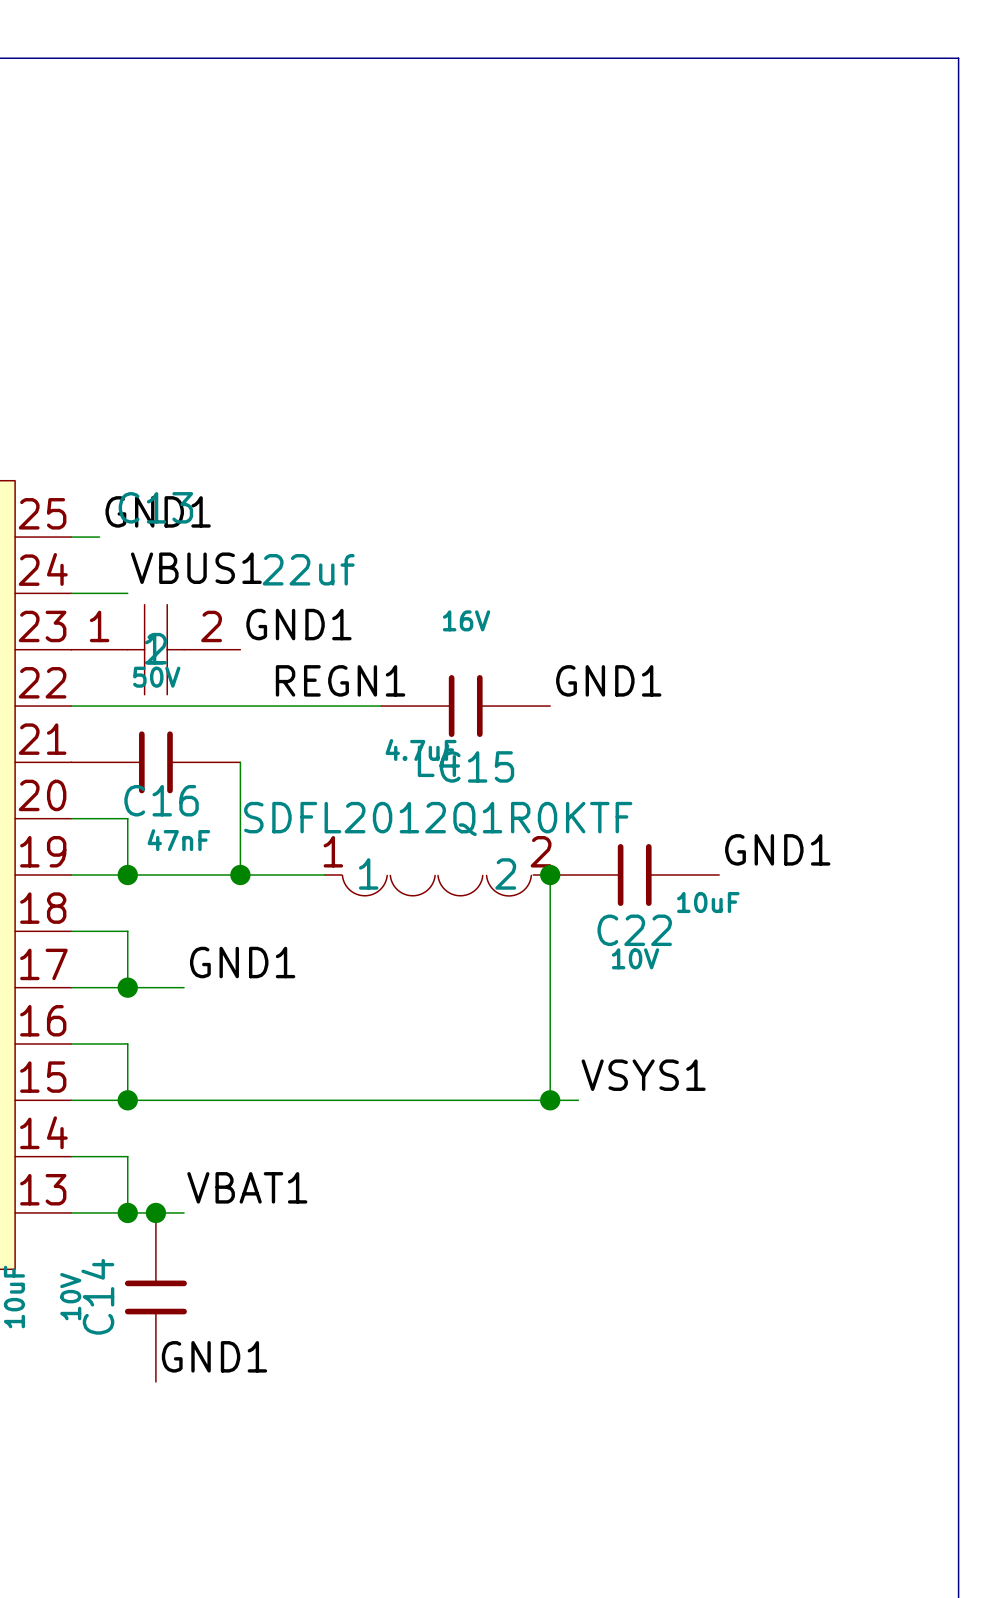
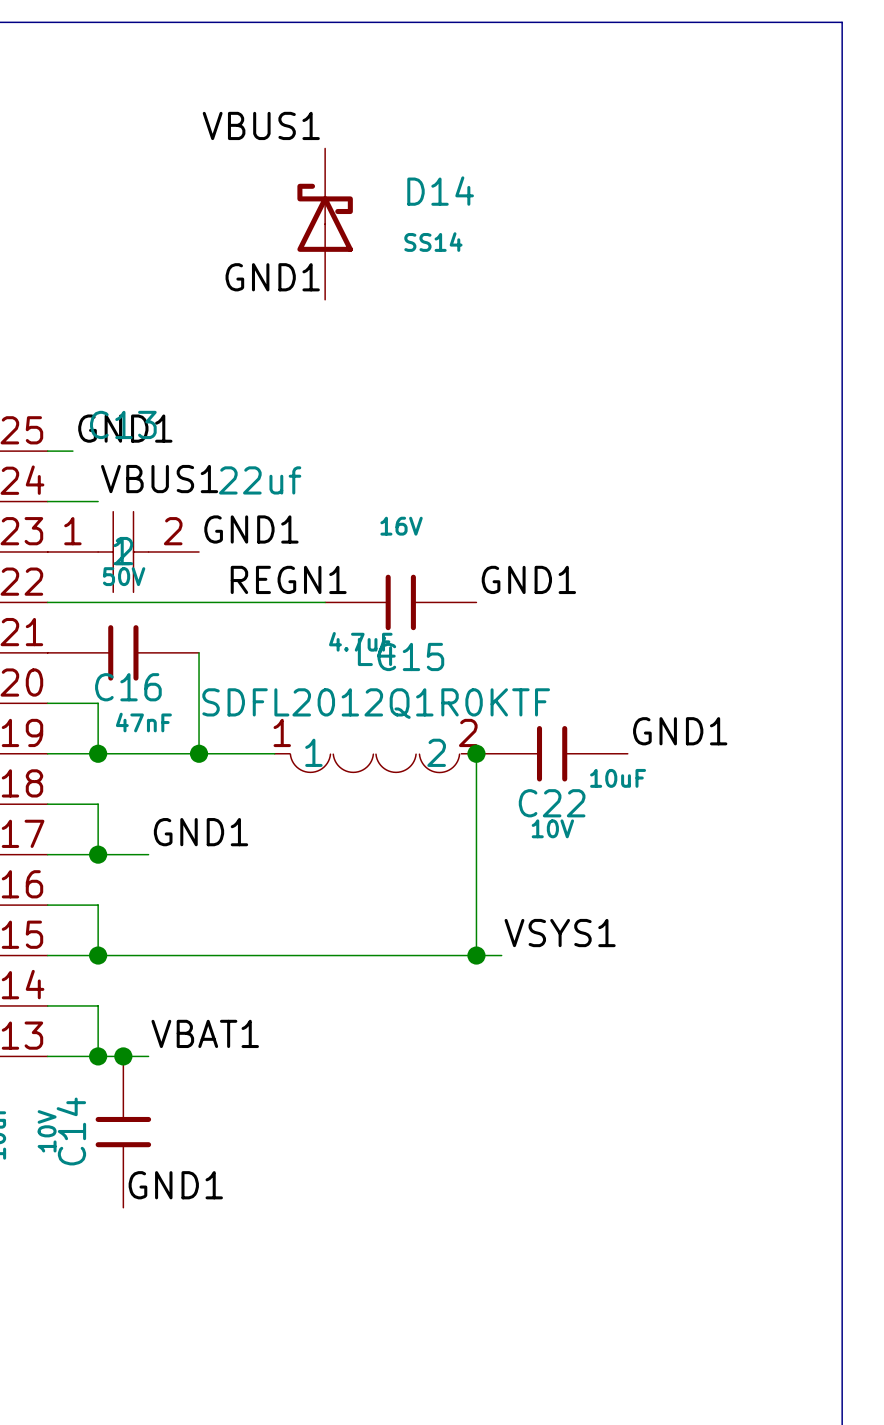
label: none -> VBUS1 (261, 125)
D14: none -> SS14 (325, 224)
label: none -> GND1 (272, 277)

